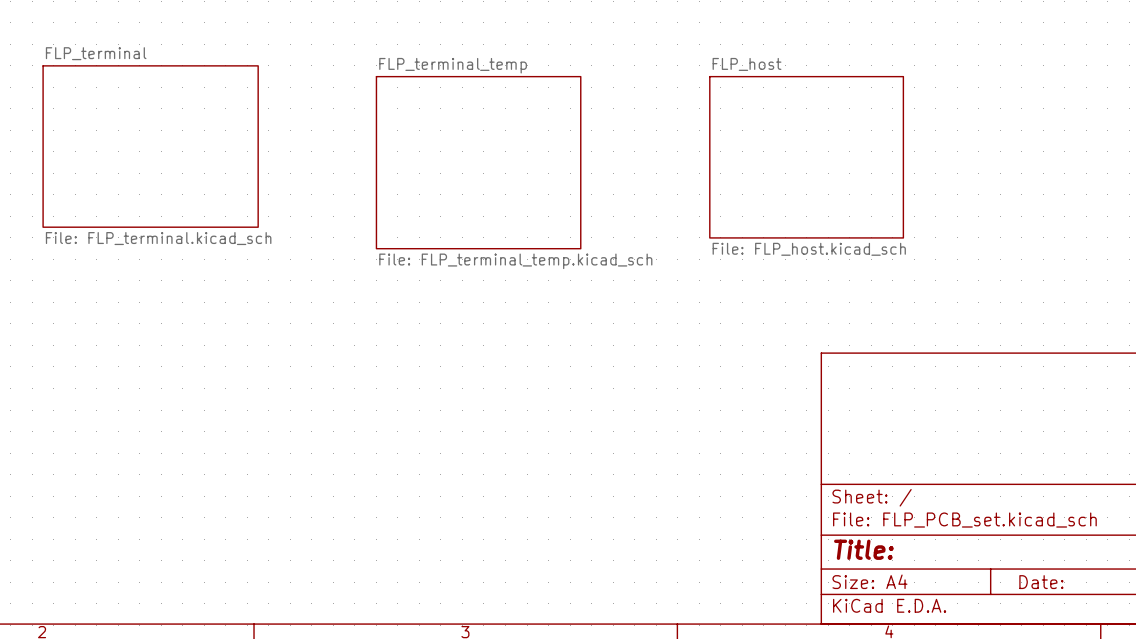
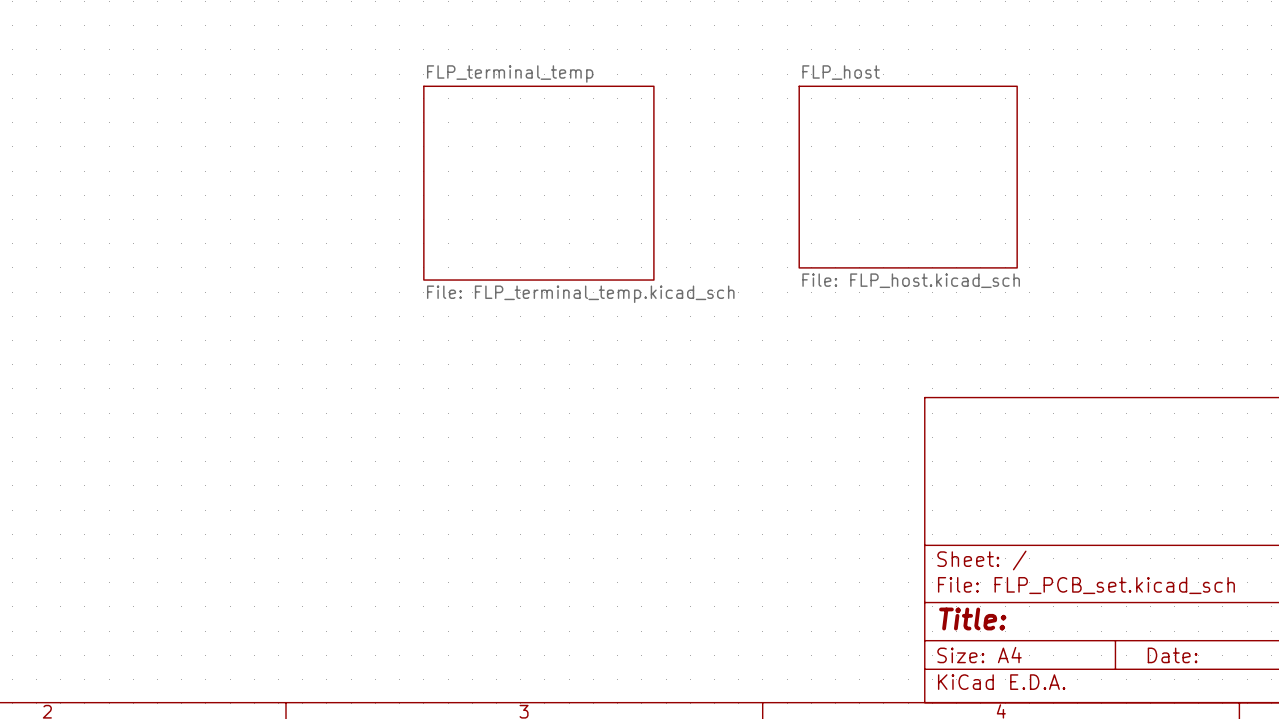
sheet FLP_terminal: File: FLP_terminal.kicad_sch (150, 146) -> none

